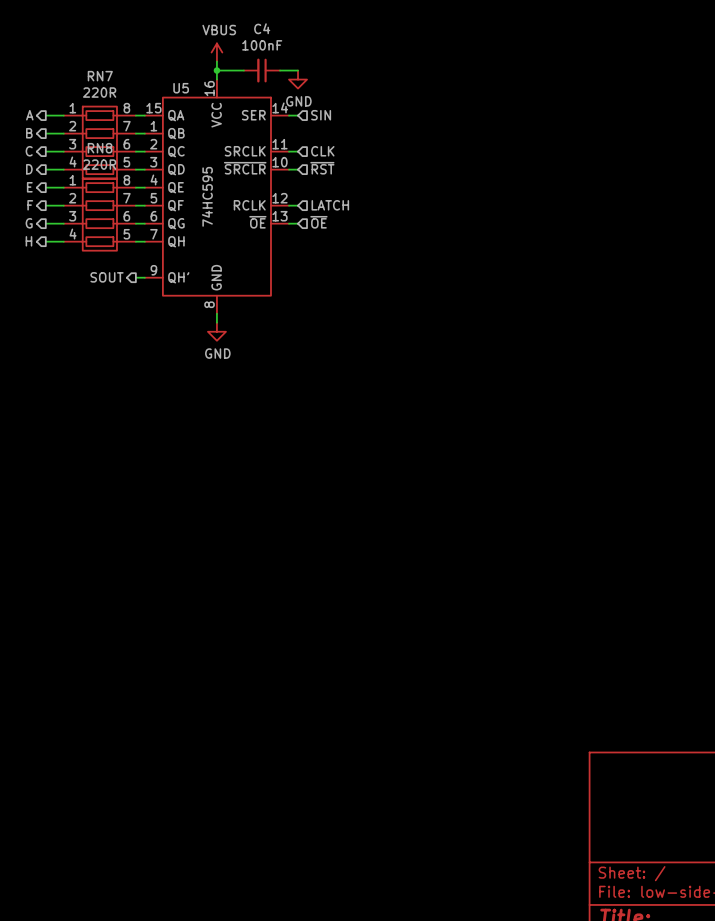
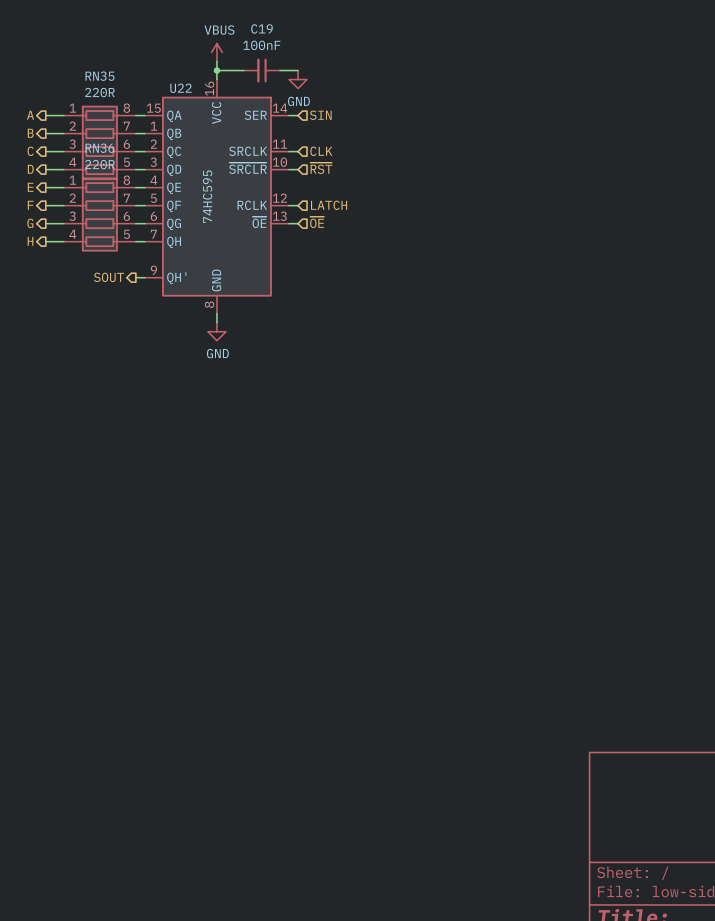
C4 name: C4 (262, 28) -> C19 (262, 28)
RN7 name: RN7 (100, 76) -> RN35 (100, 76)
U5 name: U5 (181, 88) -> U22 (181, 88)
RN8 name: RN8 (100, 148) -> RN36 (100, 148)

